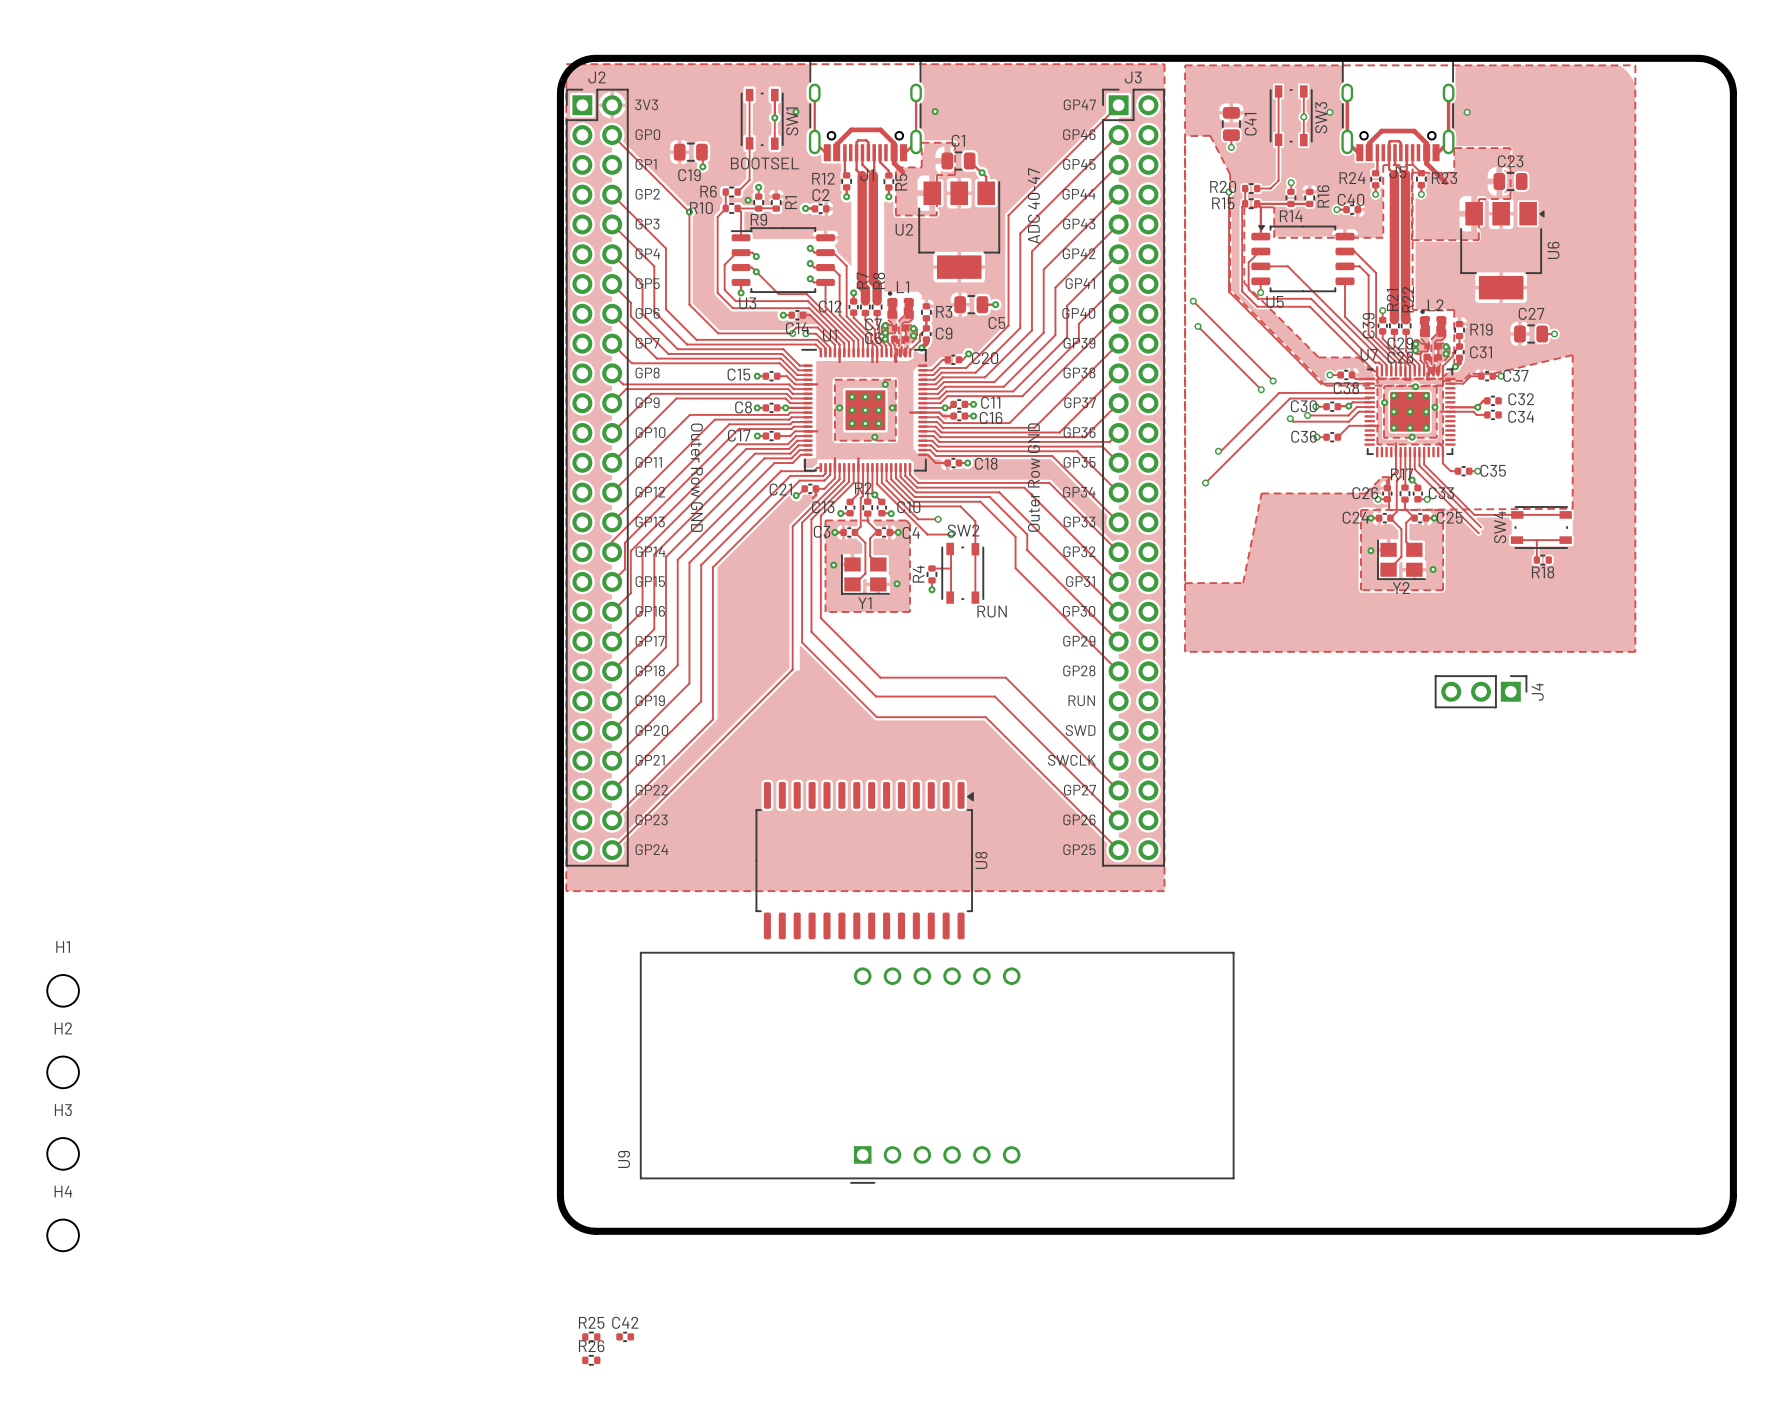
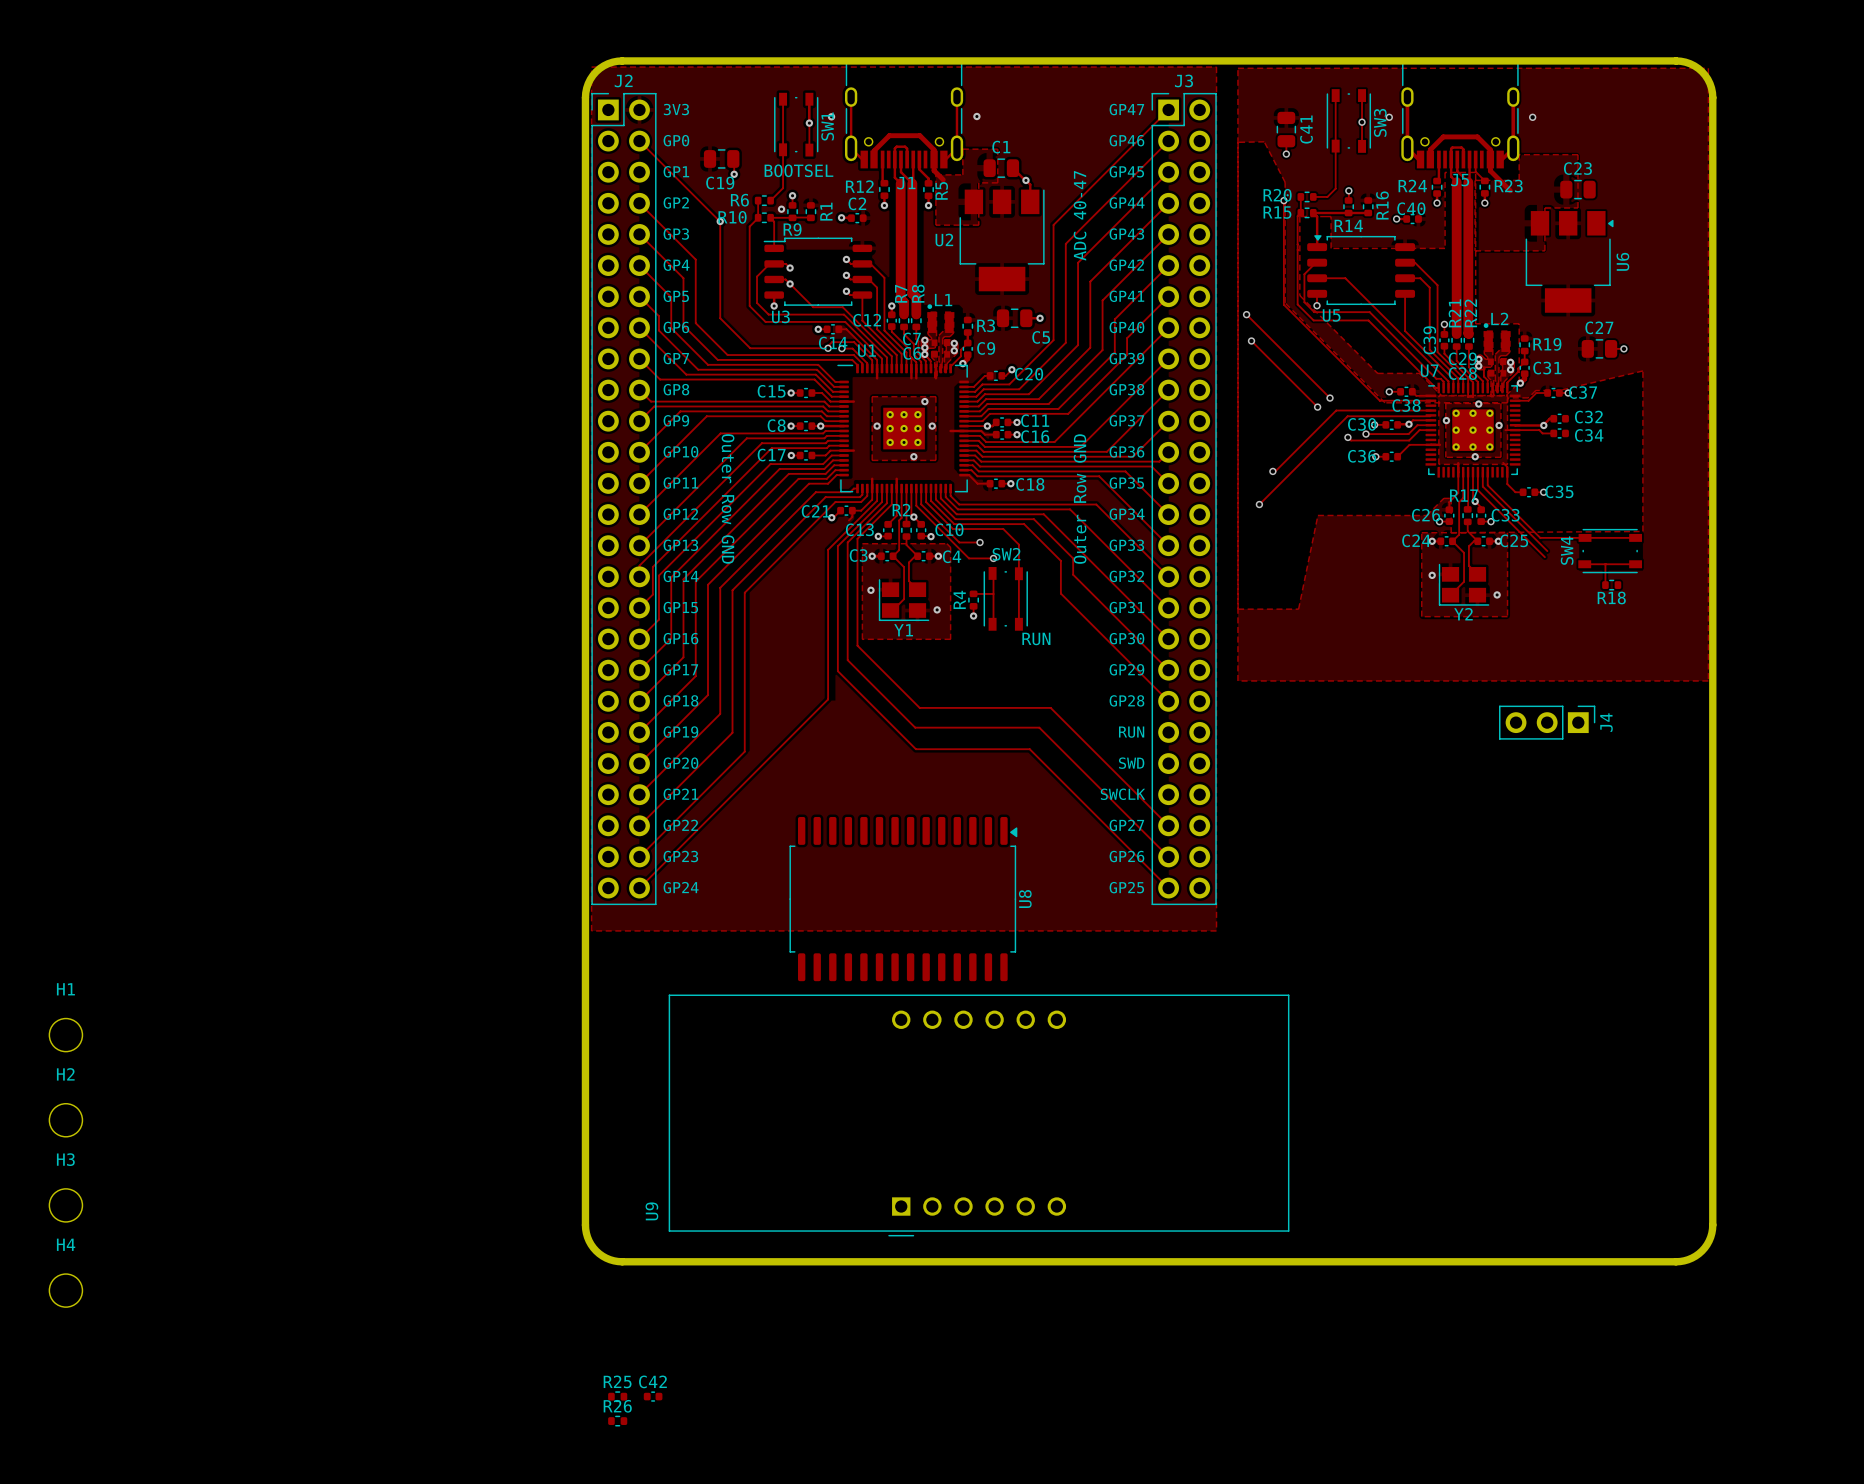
board edge: (1604, 58) (1707, 59) (1719, 65) (1726, 72) (1733, 88) (1733, 1196) (1730, 1209) (1723, 1220) (1711, 1228) (1698, 1231) (595, 1231) (578, 1226) (565, 1213) (560, 1200) (560, 1172) -> (1676, 60) (1690, 63) (1702, 71) (1709, 83) (1712, 97) (1712, 1225) (1710, 1237) (1702, 1251) (1691, 1258) (1676, 1261) (622, 1261) (606, 1258) (596, 1251) (589, 1240) (585, 1225)

